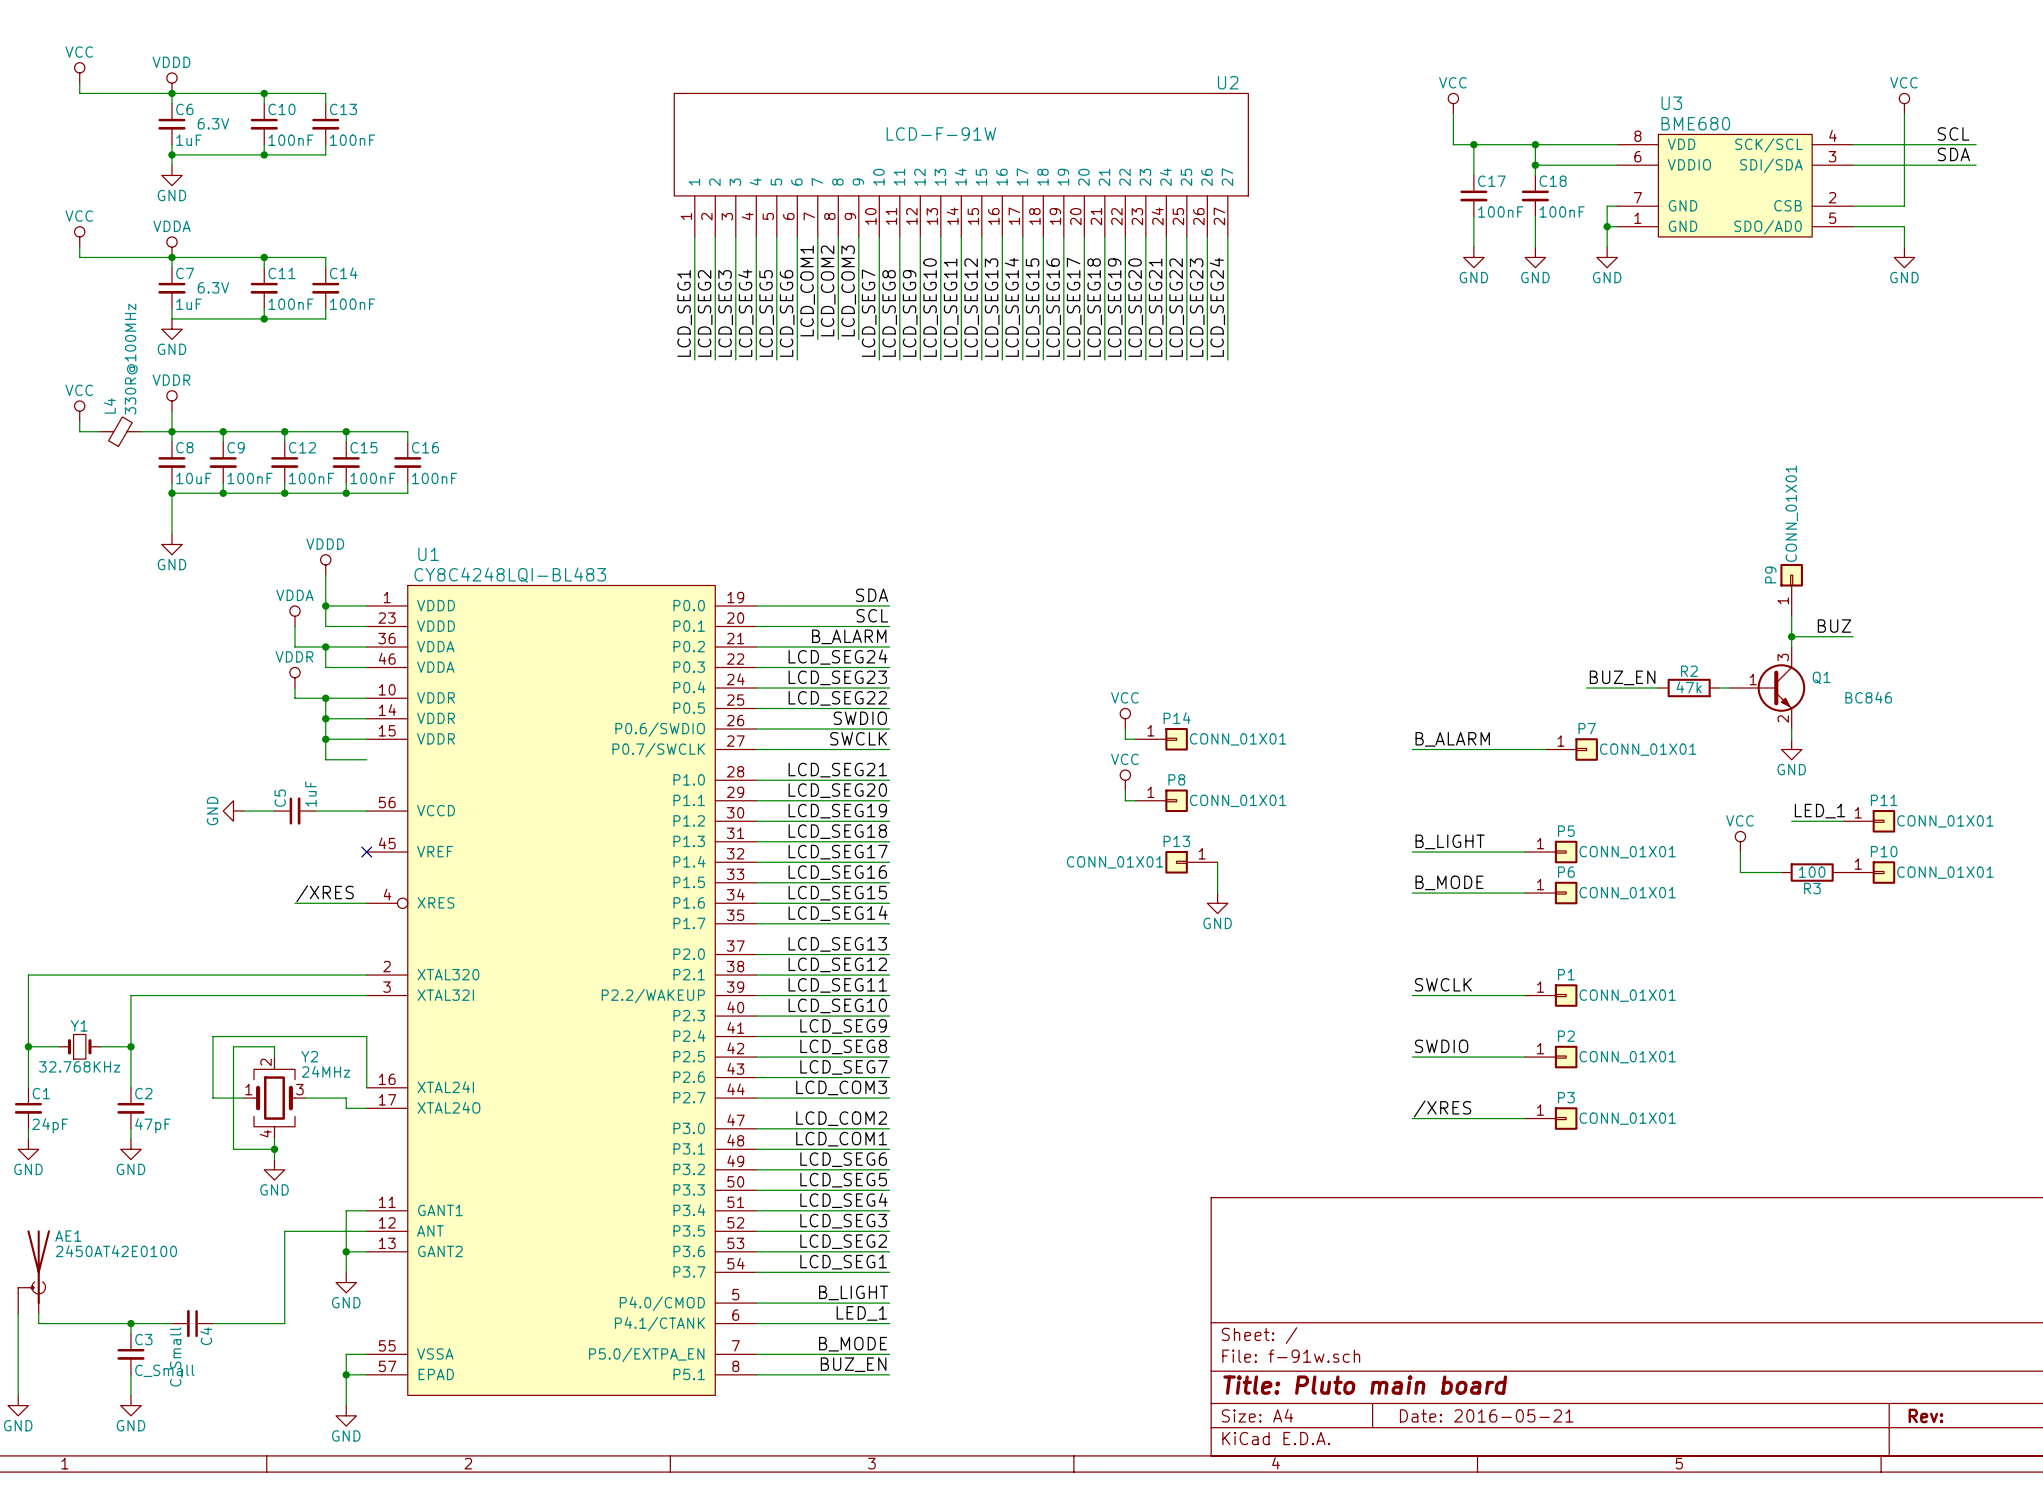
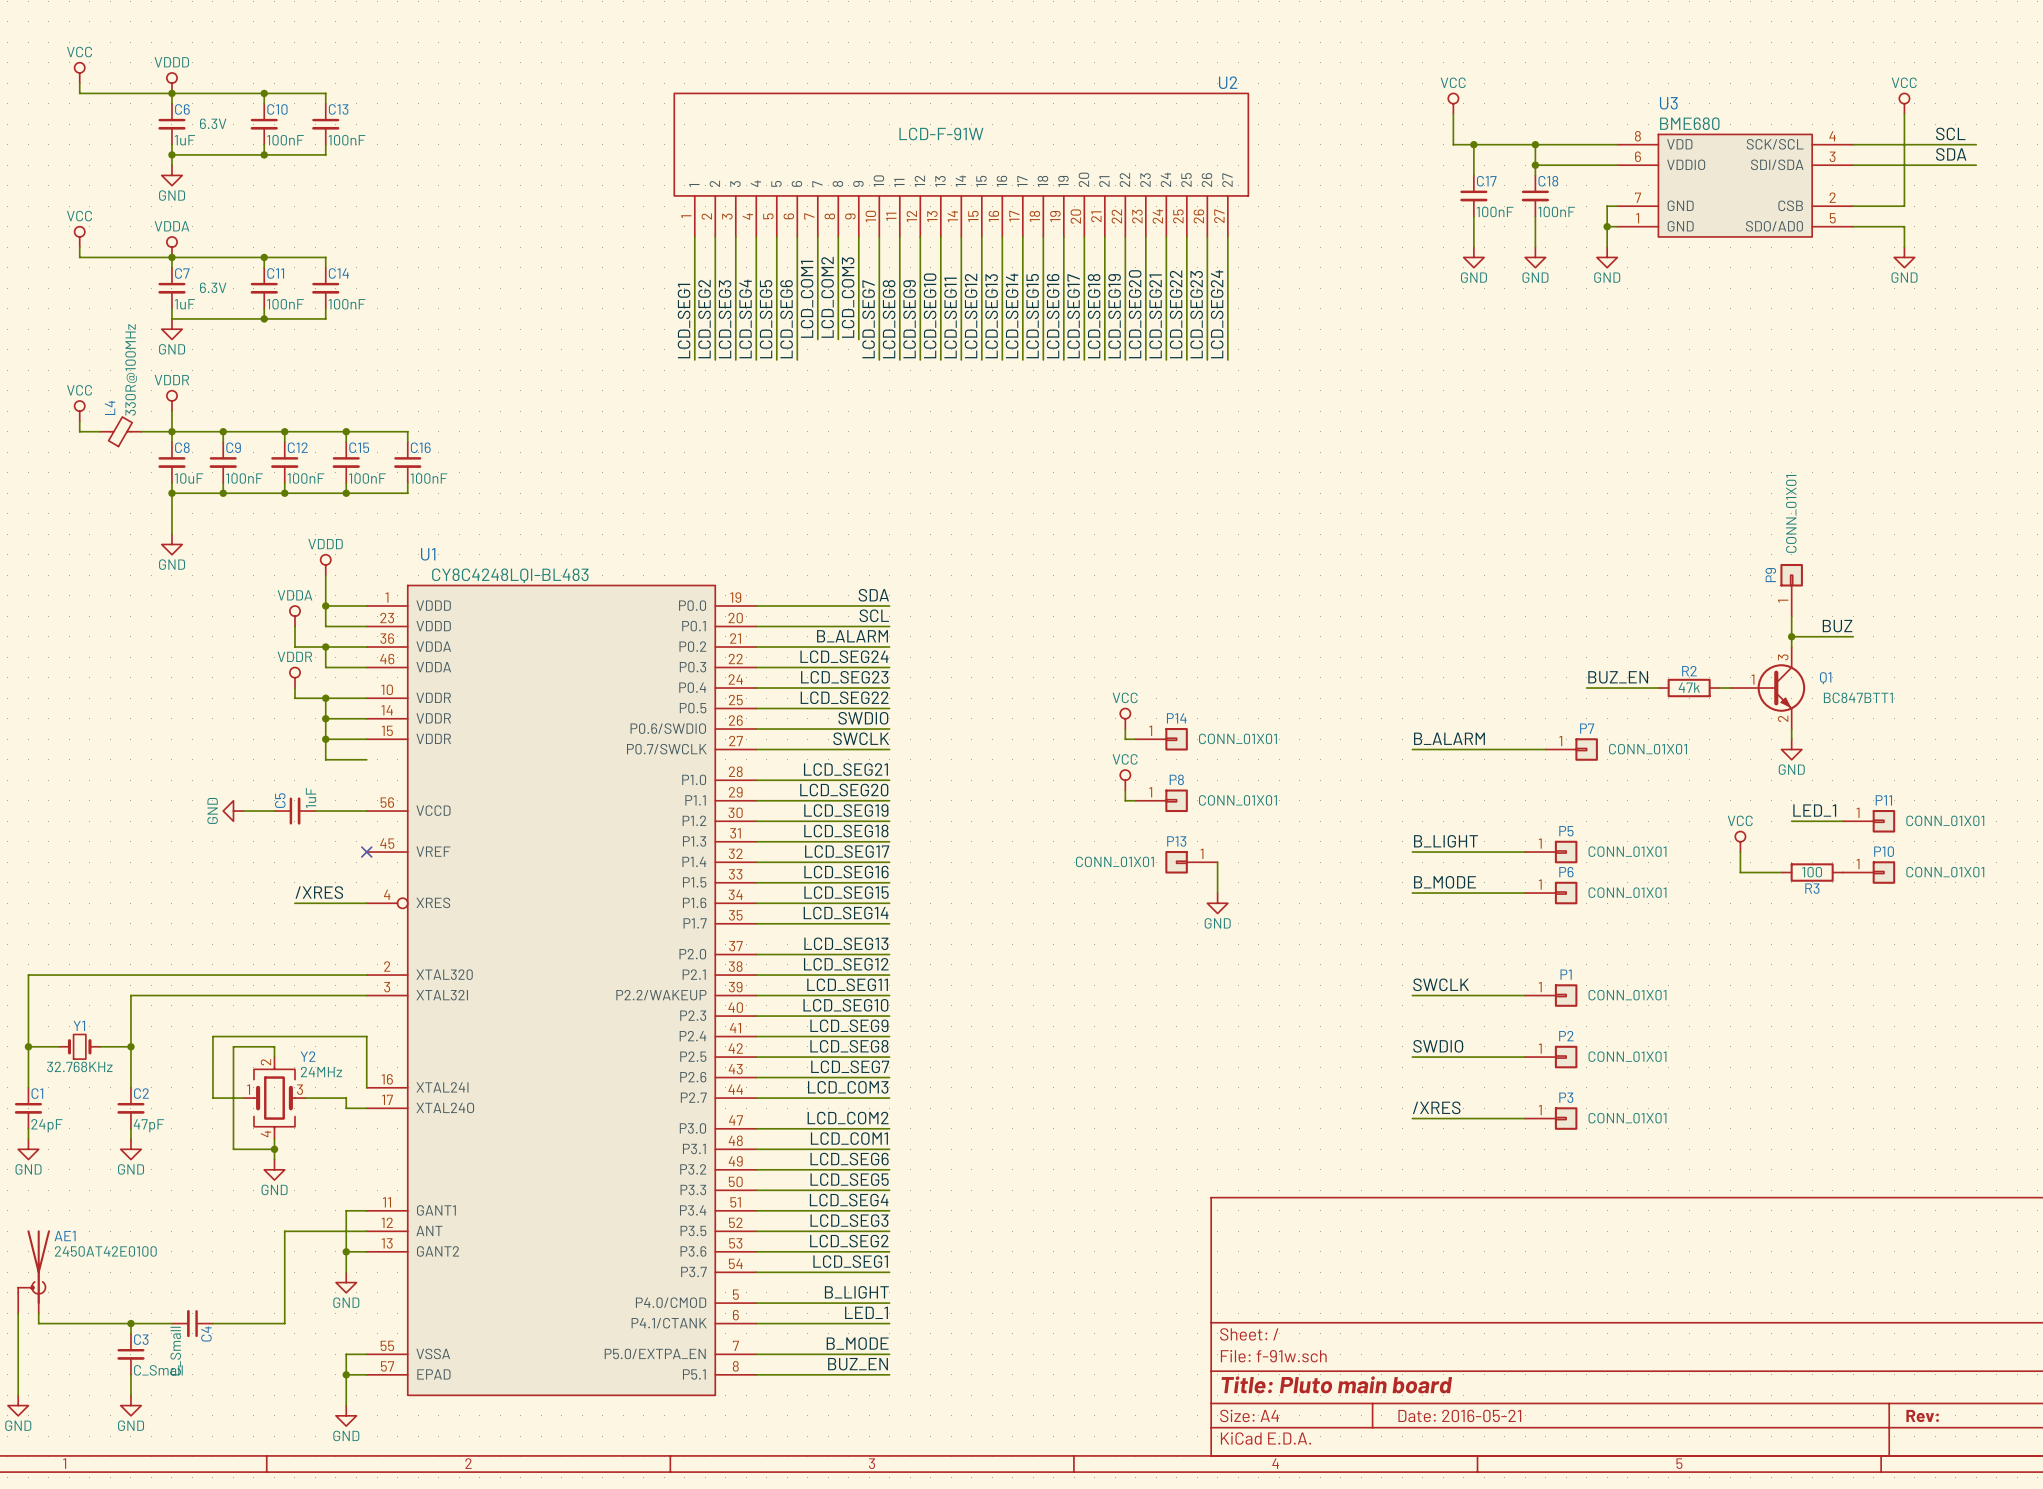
Q1 value: BC846 (1868, 697) -> BC847BTT1 (1858, 697)

